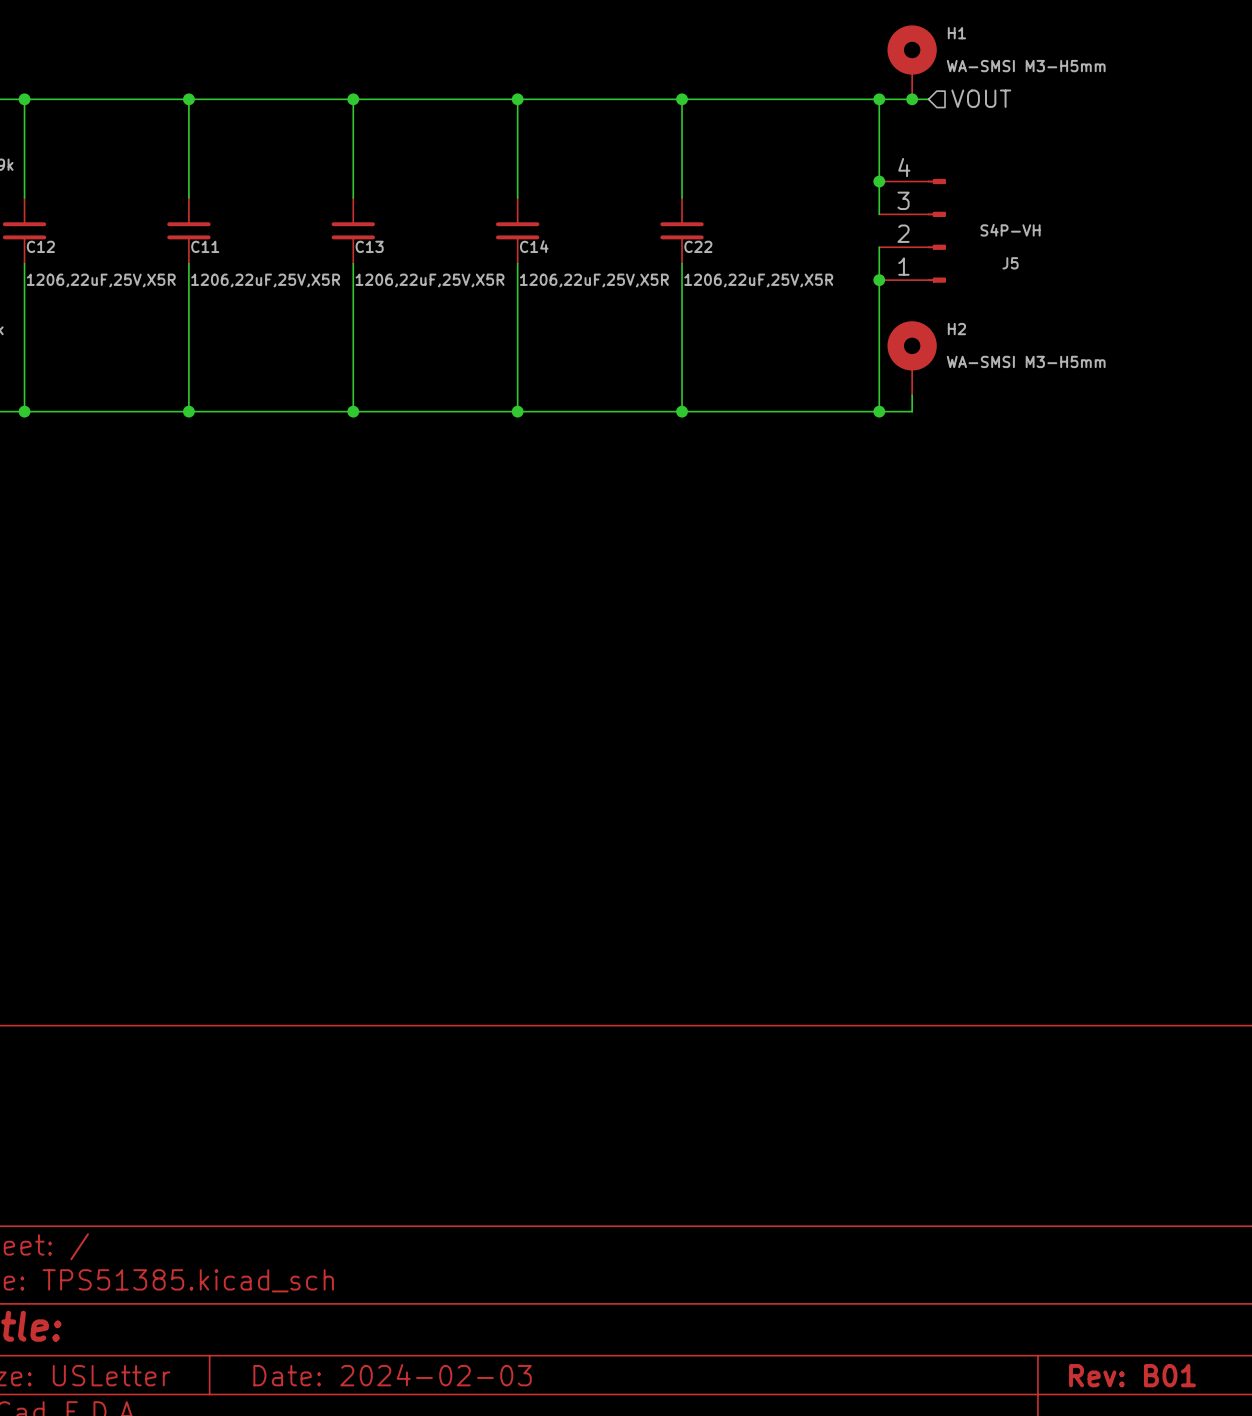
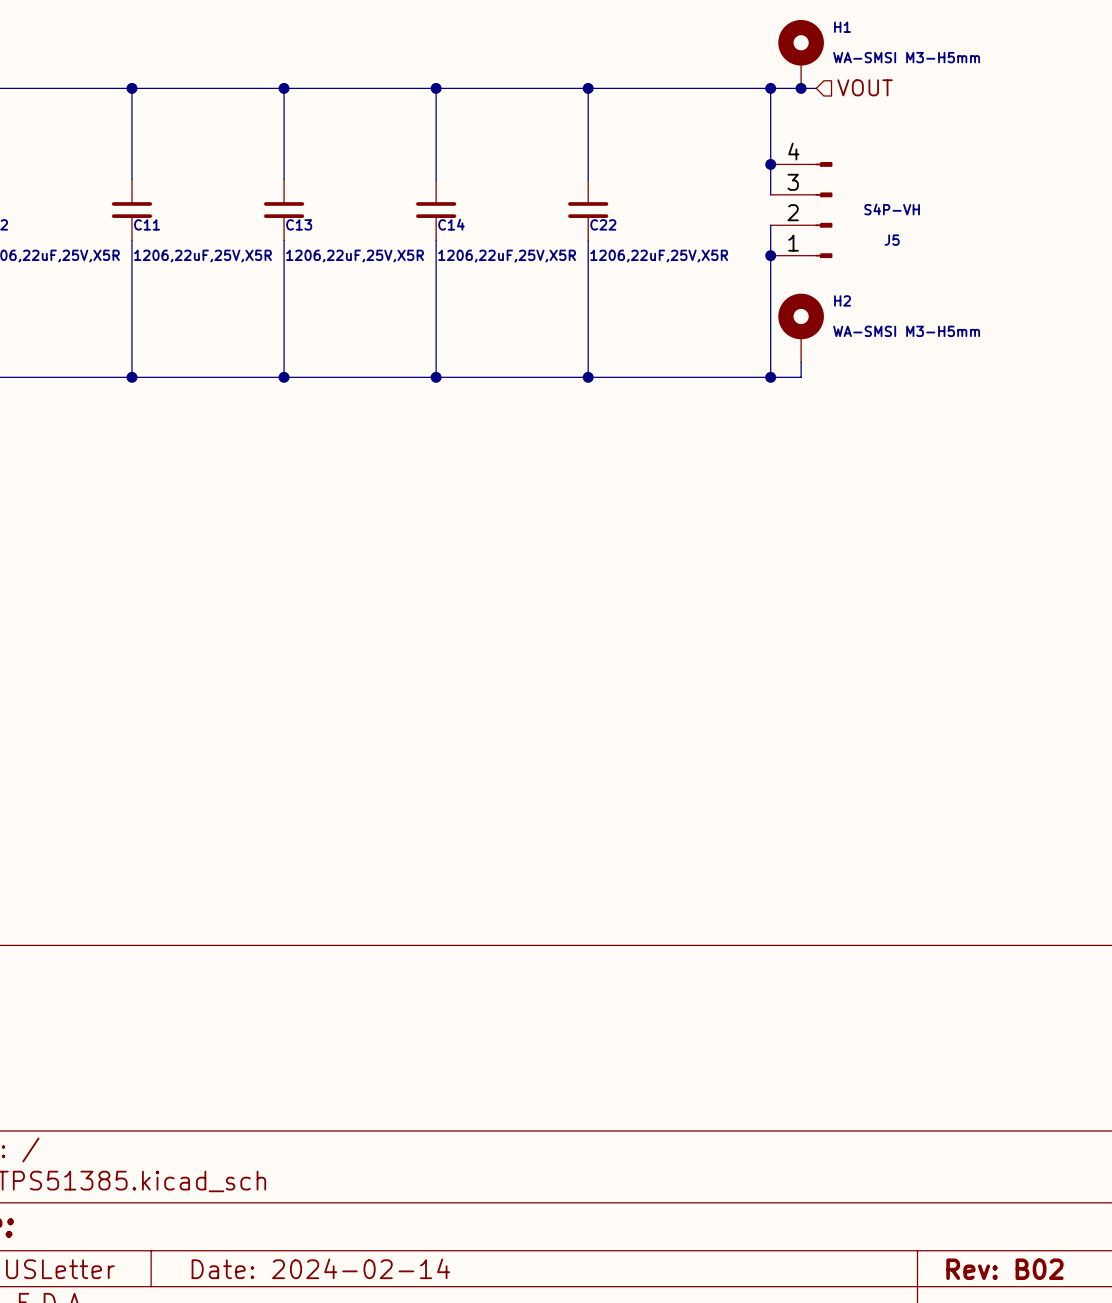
title block: Date: 2024-02-03 (392, 1375) -> Date: 2024-02-14 (320, 1268)
title block: Rev: B01 (1132, 1375) -> Rev: B02 (1004, 1269)

